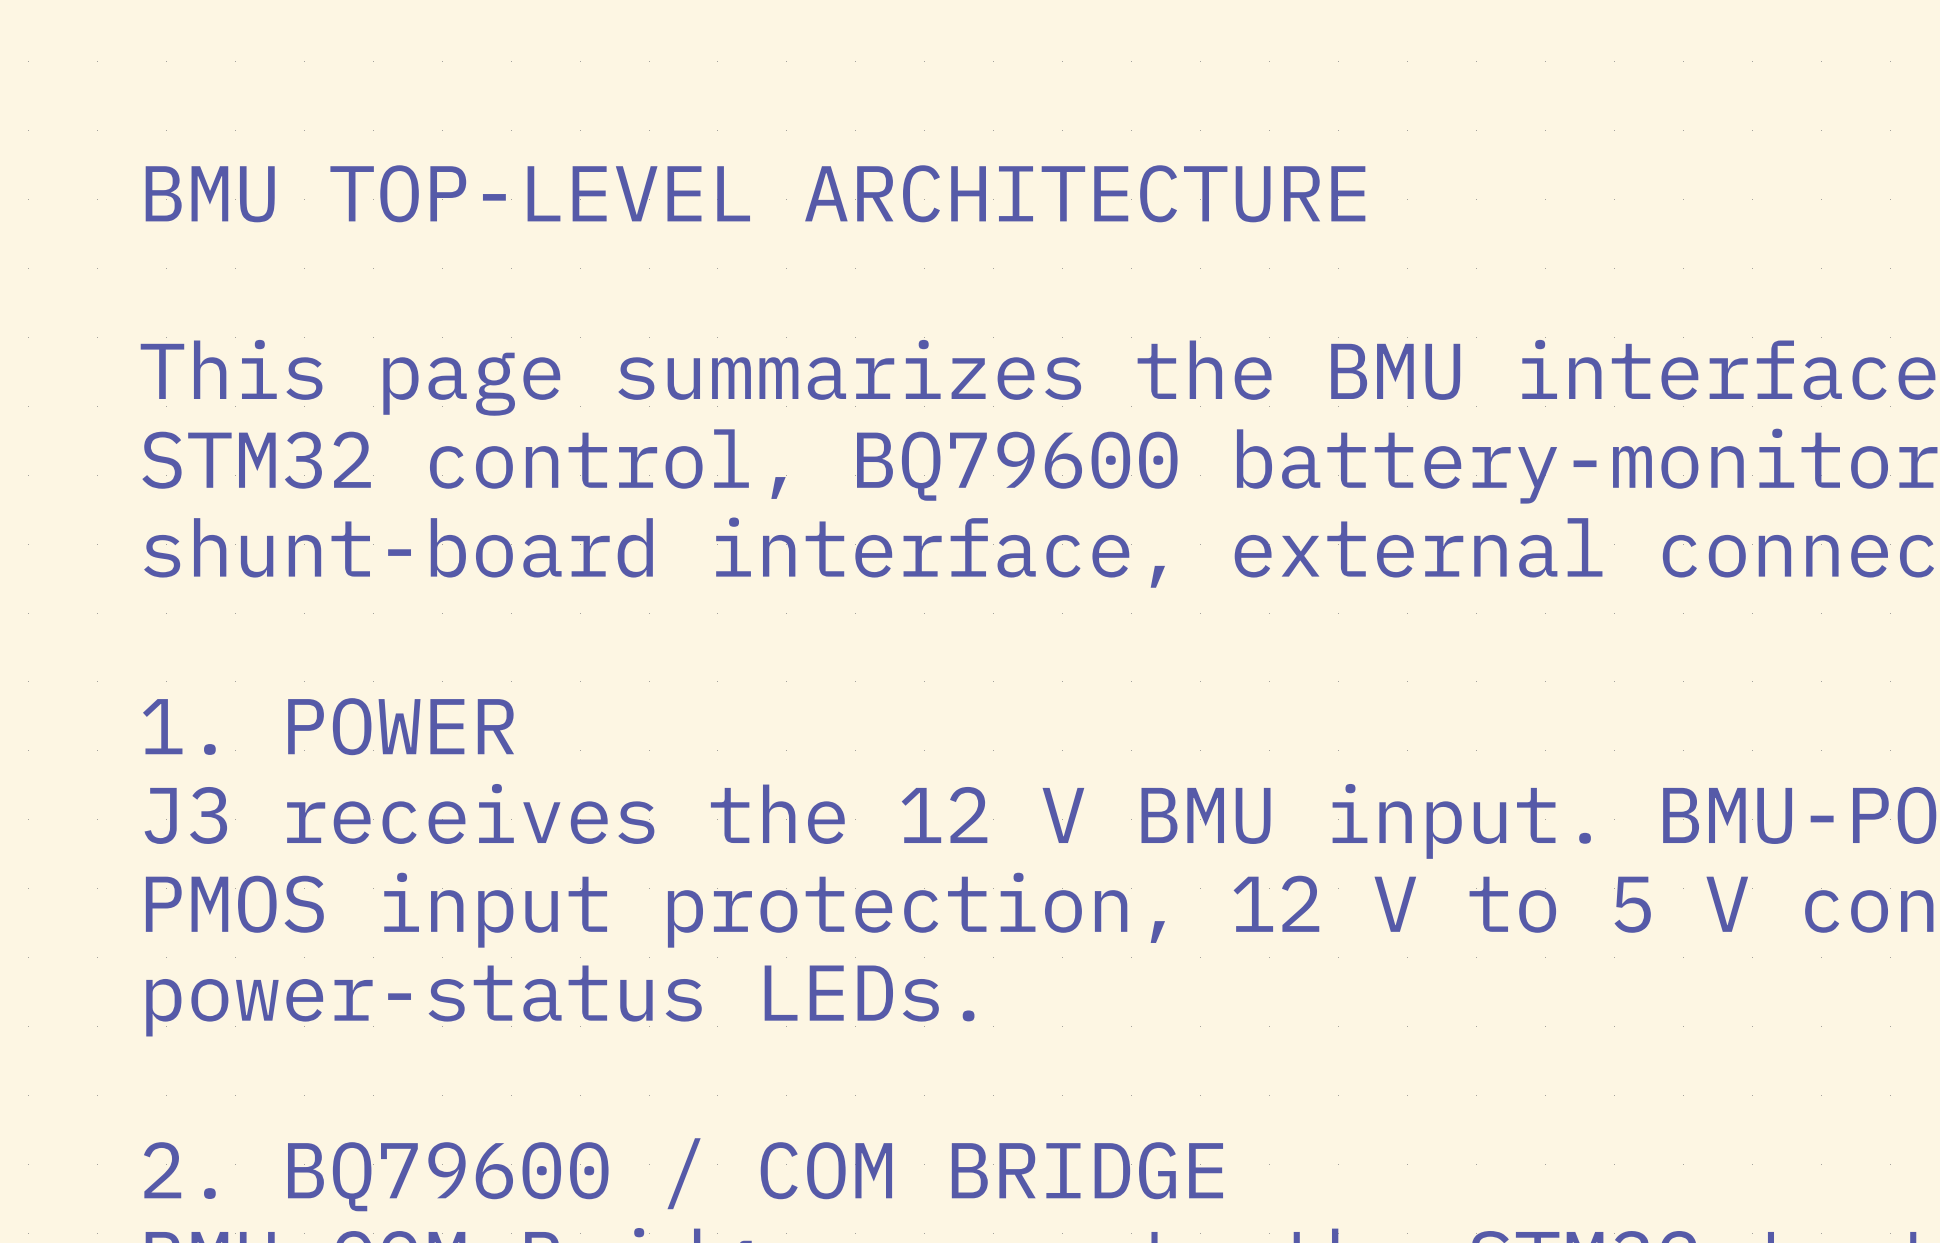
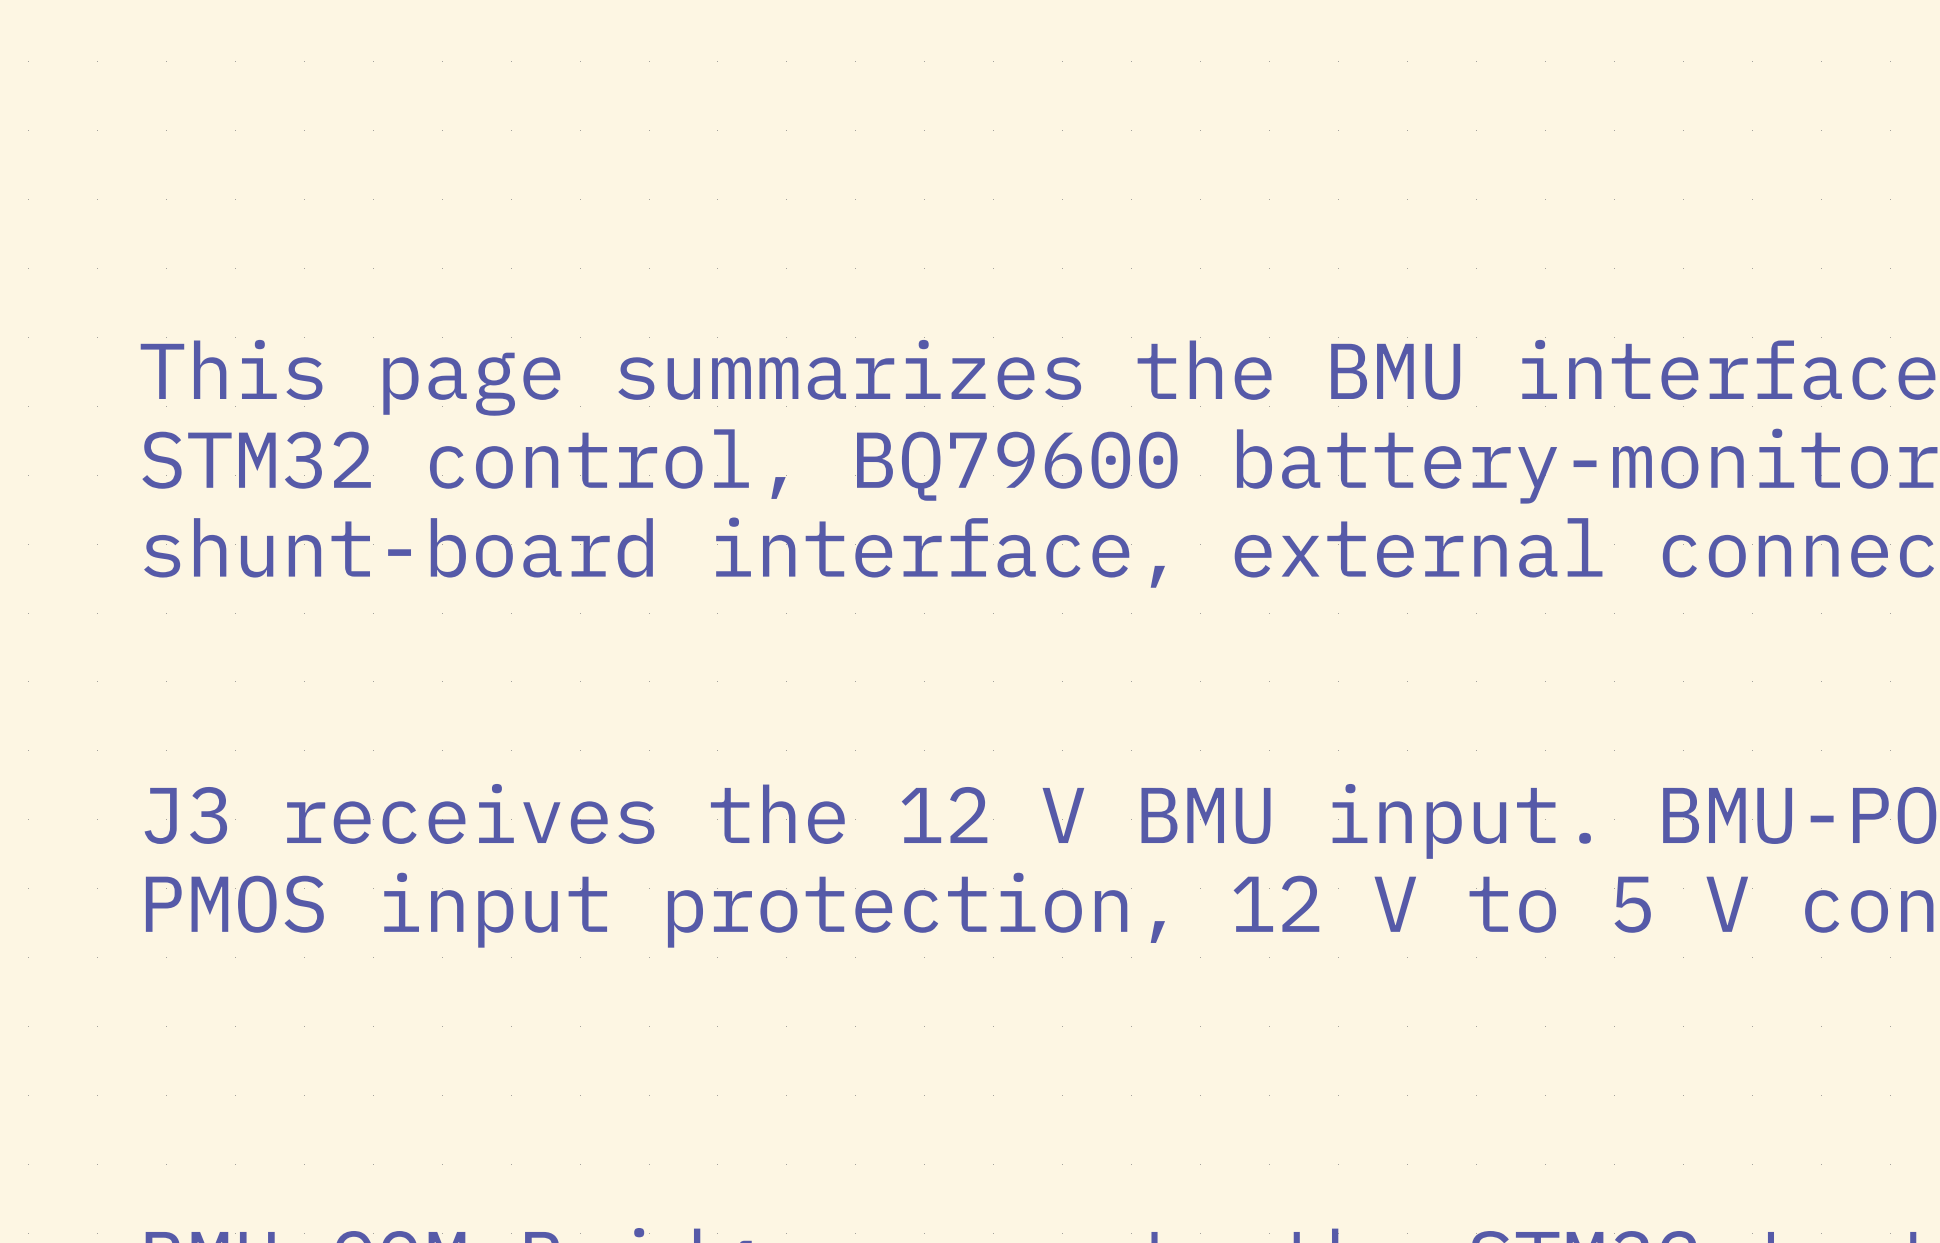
text: BMU TOP-LEVEL ARCHITECTURE (755, 193) -> none
text: 1. POWER (328, 726) -> none
text: power-status LEDs. (560, 1000) -> none
text: 2. BQ79600 / COM BRIDGE (683, 1174) -> none

